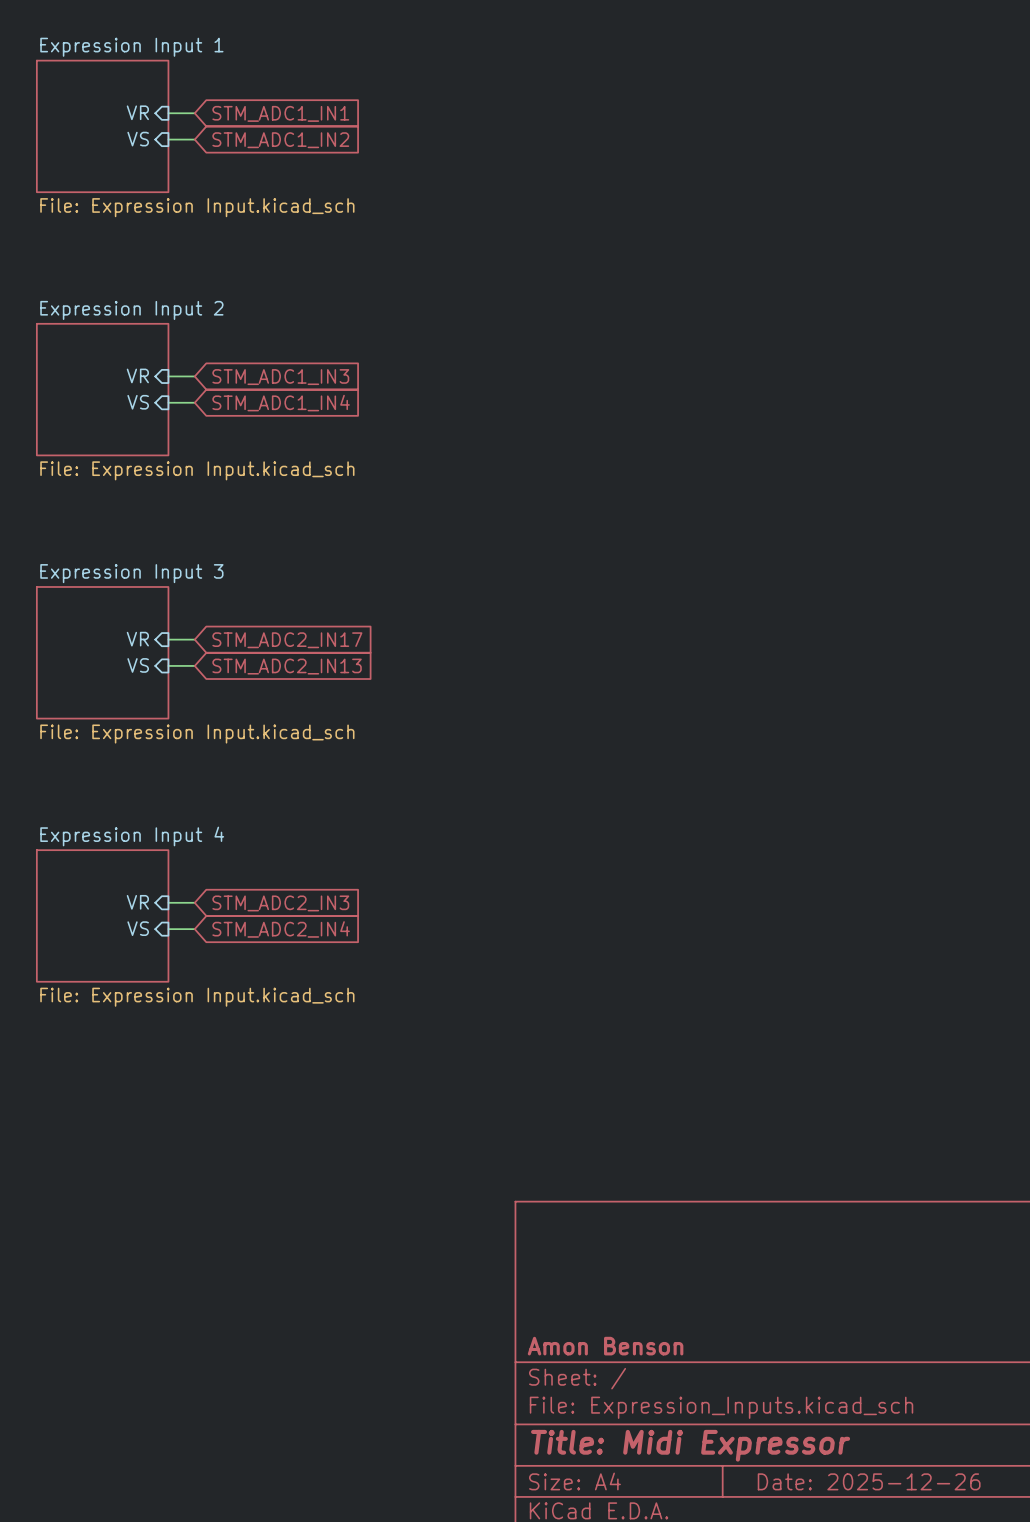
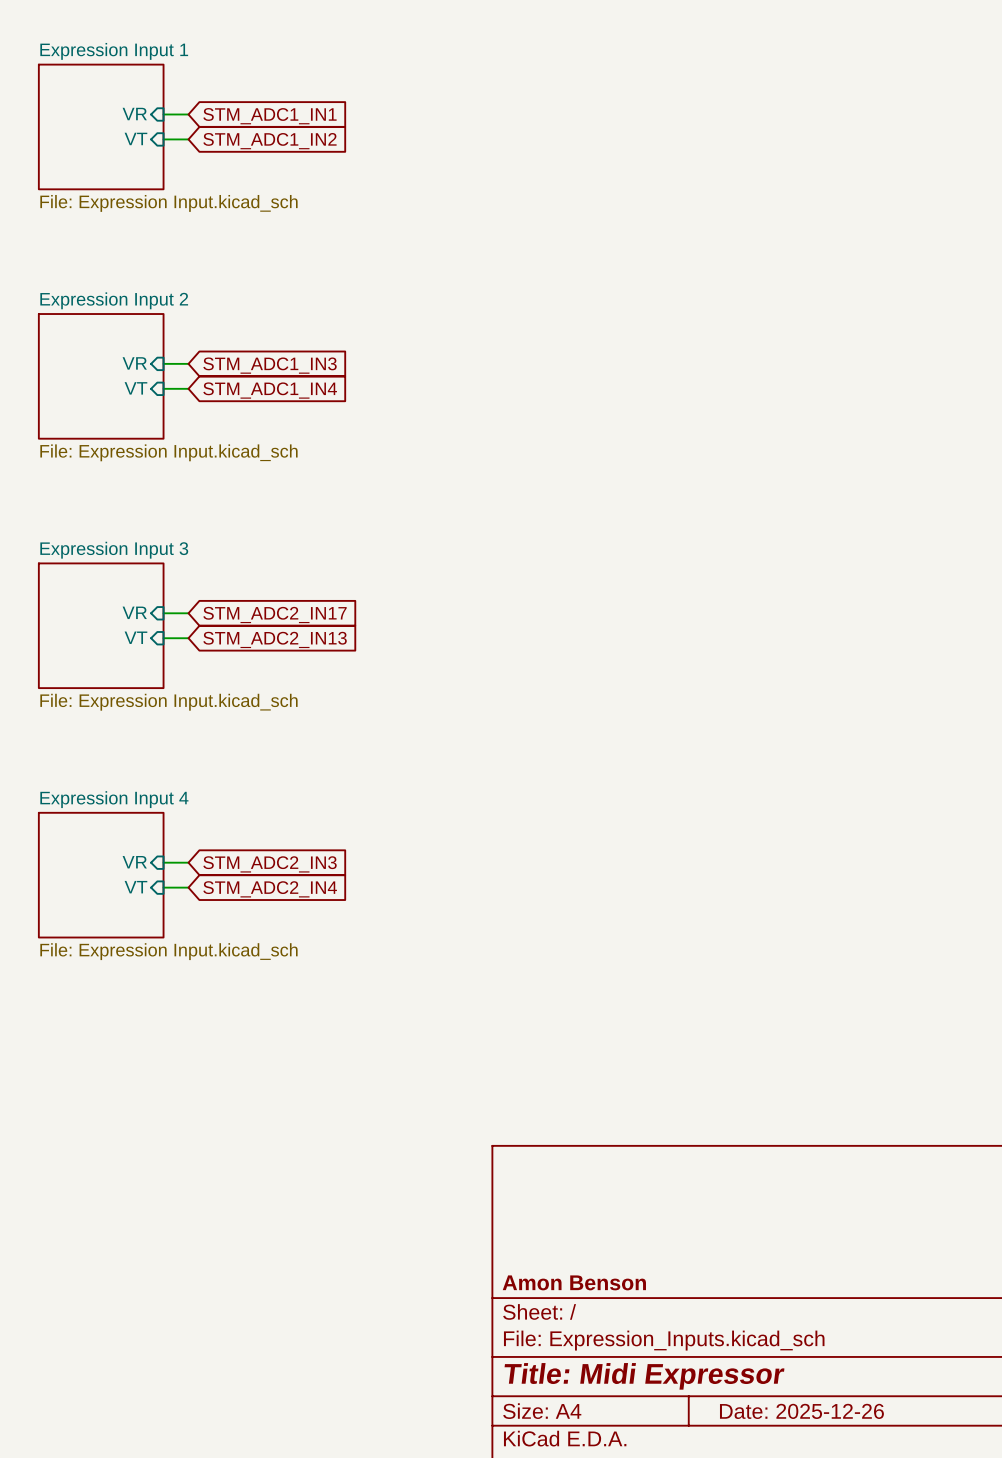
sheet pin: VS (138, 139) -> VT (135, 138)
sheet pin: VS (138, 402) -> VT (135, 388)
sheet pin: VS (138, 665) -> VT (135, 637)
sheet pin: VS (138, 928) -> VT (135, 887)

